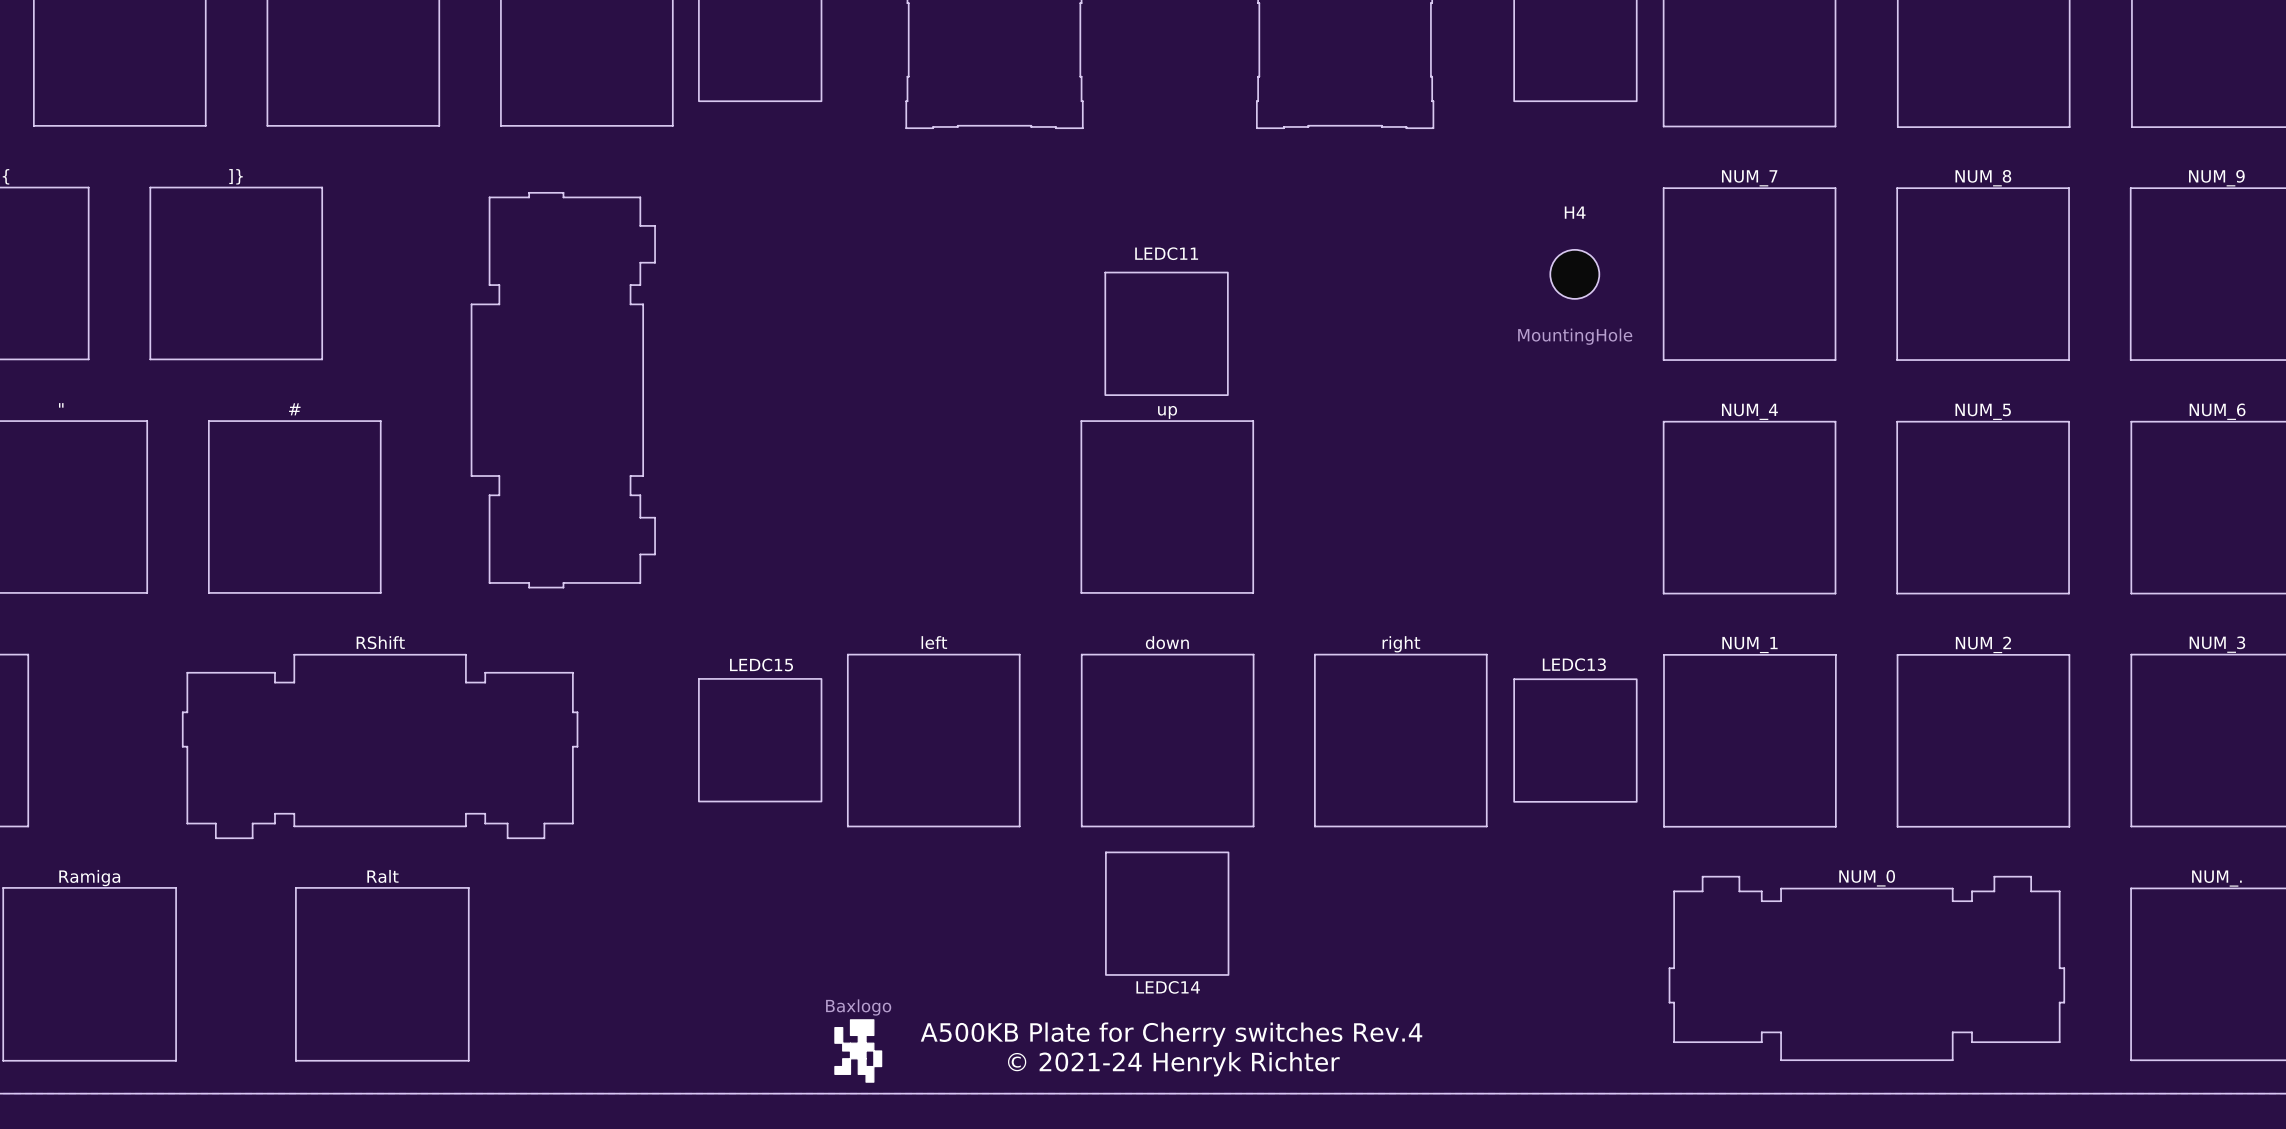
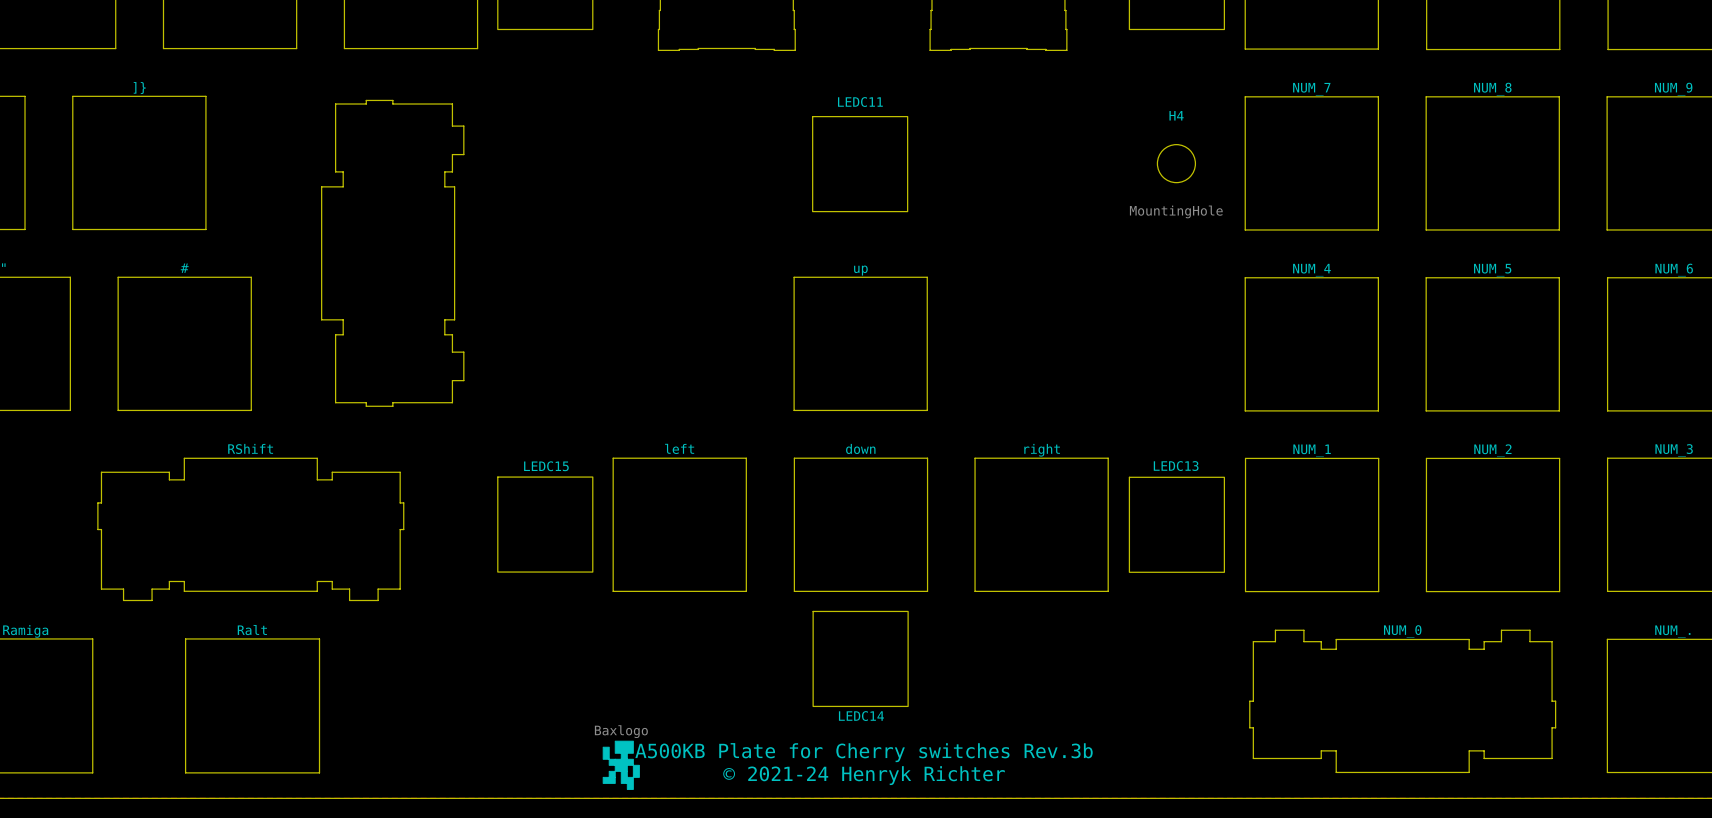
LEDC11 position: (1166, 333) -> (860, 164)
text: A500KB Plate for Cherry switches Rev.4 (1171, 1034) -> A500KB Plate for Cherry switches Rev.3b (864, 752)

